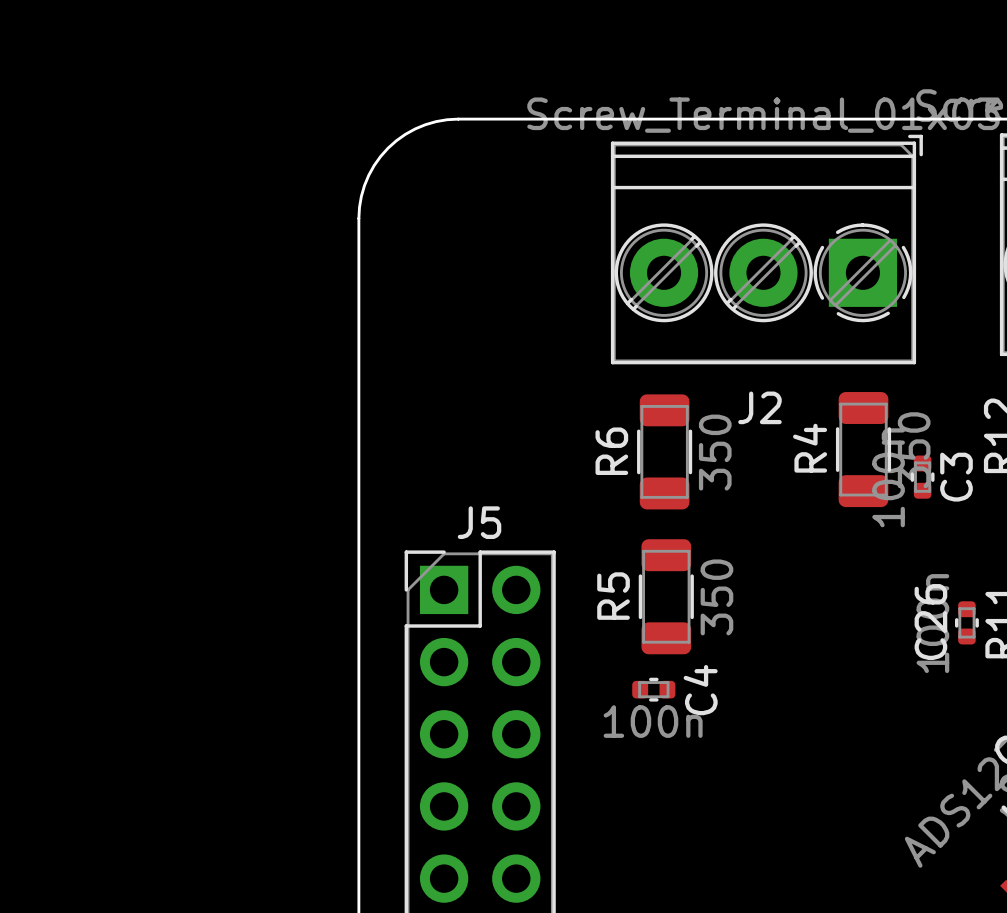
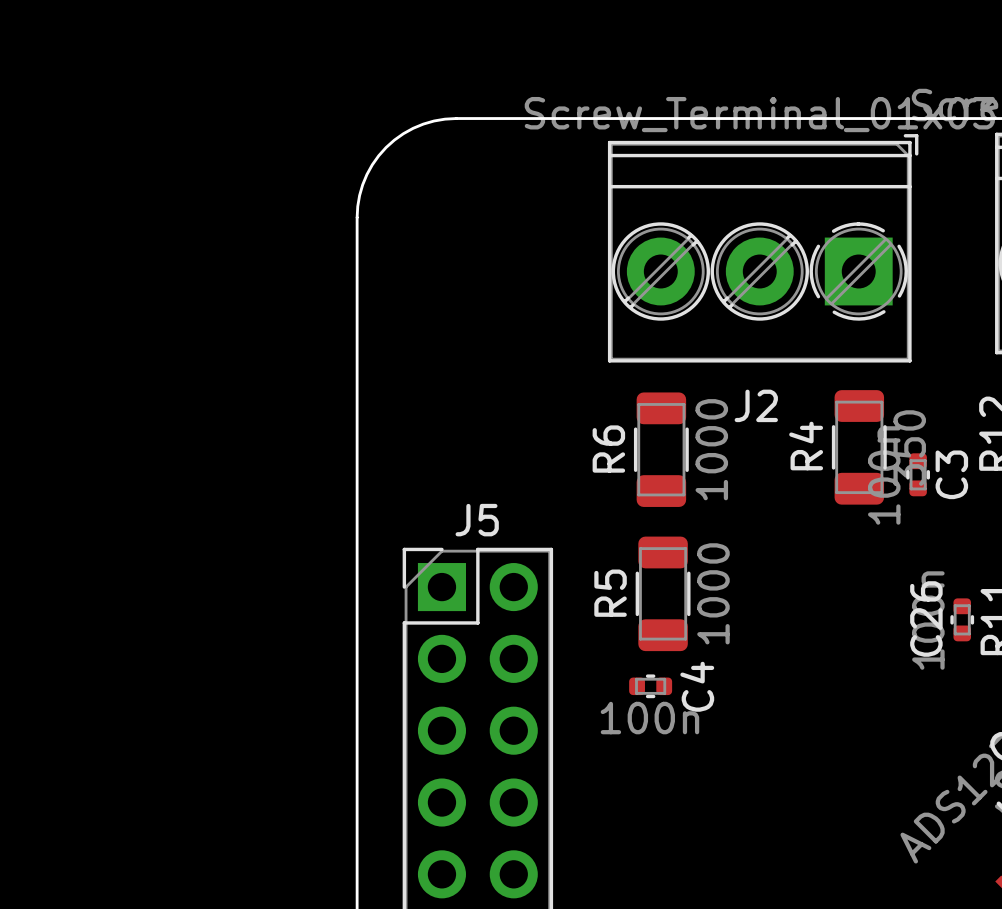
R6 value: 350 (715, 452) -> 1000 (711, 449)
R5 value: 350 (716, 597) -> 1000 (713, 593)

